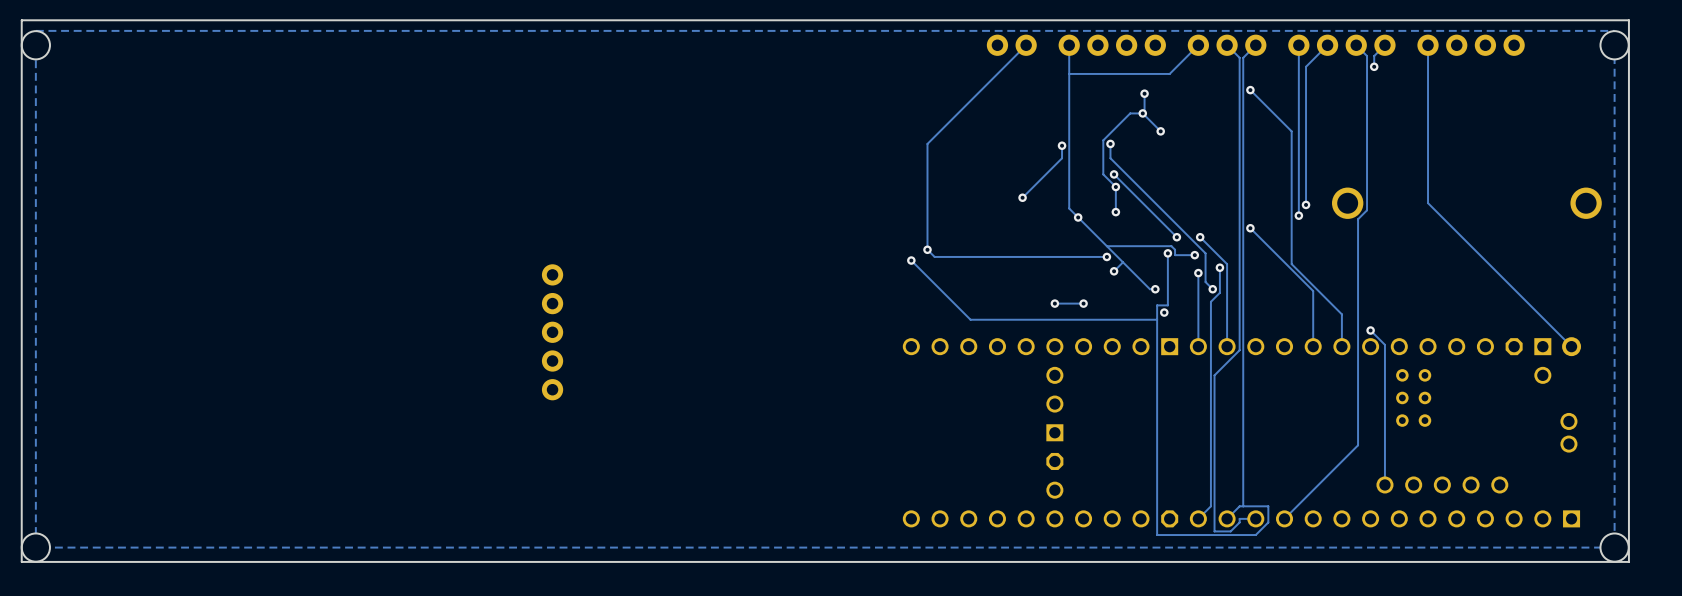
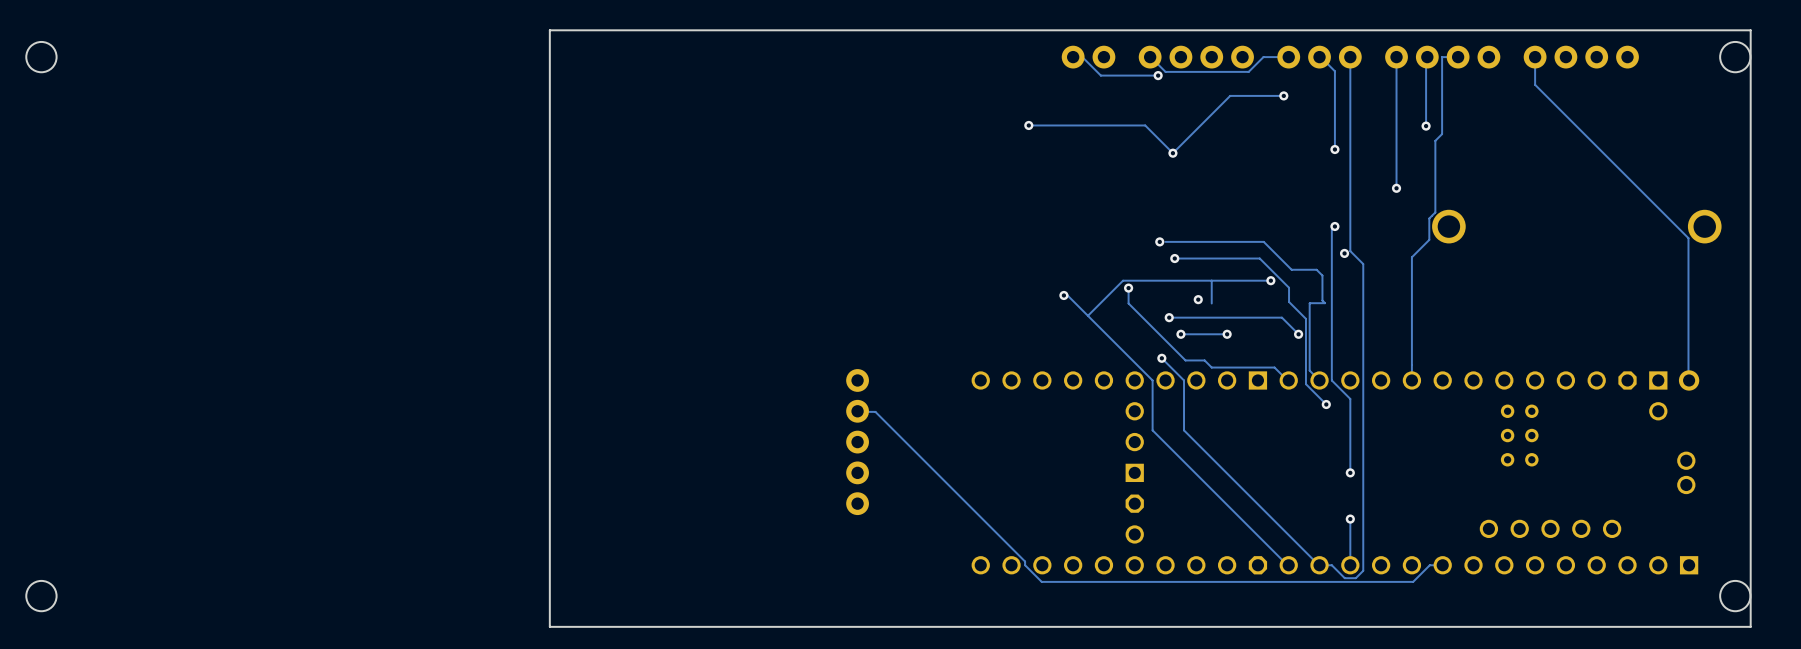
board edge: (509, 20) (21, 20) (21, 561) (1628, 561) -> (549, 30) (549, 626) (1750, 626) (1750, 611)
zone outline: (1614, 30) (1614, 547) (35, 547) (35, 30) (1614, 30) -> none
track: none -> (1073, 57) (1082, 57) (1100, 75) (1158, 75)
track: (1026, 45) (927, 143) (927, 249) (934, 256) (1106, 256) -> none
track: (1069, 45) (1069, 208) (1149, 289) (1155, 289) -> none
track: (1198, 45) (1169, 73) (1069, 73) -> (1288, 57) (1263, 57) (1248, 71) (1165, 71) (1150, 57)
track: (1227, 45) (1239, 57) (1239, 350) (1214, 375) (1214, 531) (1230, 531) (1239, 522) (1239, 518) (1255, 518) -> (1319, 57) (1334, 71) (1334, 149)
track: (1255, 45) (1243, 57) (1243, 506) -> (1350, 57) (1350, 251) (1363, 264) (1363, 570) (1355, 578) (1344, 578) (1331, 565) (1318, 565) (1184, 430) (1184, 380) (1161, 358)
track: (1327, 45) (1306, 66) (1306, 204) -> (1427, 57) (1426, 126)
track: (1356, 45) (1367, 56) (1367, 210) (1358, 219) (1358, 445) (1284, 518) -> none
track: (1384, 45) (1374, 56) (1374, 66) -> none
via: none -> (1158, 75)
via: (1374, 66) -> none
track: (1428, 71) (1428, 203) (1571, 346) -> (1535, 84) (1688, 238) (1689, 380)
track: none -> (1283, 95) (1230, 95) (1172, 153) (1145, 125) (1028, 125)
via: none -> (1283, 95)
track: (1250, 90) (1291, 131) (1291, 264) (1341, 314) (1341, 346) -> none
via: (1250, 90) -> none
track: (1144, 93) (1144, 111) (1142, 113) -> none
via: (1144, 93) -> none
via: none -> (1028, 125)
via: none -> (1426, 126)
track: (1142, 113) (1130, 113) (1103, 140) (1103, 174) (1115, 186) (1115, 212) -> none
track: (1142, 113) (1160, 131) -> none
via: (1142, 113) -> none
via: (1160, 131) -> none
via: none -> (1334, 149)
via: none -> (1172, 153)
track: (1110, 143) (1110, 158) (1205, 253) (1205, 282) (1212, 289) -> none
via: (1110, 143) -> none
track: (1062, 145) (1062, 158) (1022, 197) -> none
via: (1062, 145) -> none
track: (1298, 167) (1298, 215) -> none
via: none -> (1396, 188)
track: (1114, 174) (1176, 237) -> none
via: (1114, 174) -> none
via: (1115, 186) -> none
via: (1022, 197) -> none
track: none -> (1334, 226) (1331, 229) (1331, 380) (1350, 398) (1350, 472)
via: none -> (1334, 226)
via: (1306, 204) -> none
via: (1115, 212) -> none
via: (1298, 215) -> none
track: (1250, 228) (1313, 291) -> (1458, 57) (1442, 57) (1442, 134) (1435, 140) (1435, 212) (1429, 218) (1429, 239) (1411, 257) (1411, 320)
track: none -> (1174, 258) (1259, 258) (1289, 287) (1289, 301) (1305, 318) (1305, 384) (1326, 404)
via: none -> (1174, 258)
via: (1176, 237) -> none
track: (1200, 237) (1227, 264) (1227, 346) -> (1165, 241) (1263, 241) (1291, 269) (1316, 269) (1322, 275) (1322, 300) (1325, 303) (1309, 303) (1309, 370) (1319, 380)
via: (1200, 237) -> none
track: (1106, 246) (1171, 246) (1175, 249) (1175, 255) (1194, 255) -> none
via: (927, 249) -> none
track: none -> (1211, 280) (1211, 303)
track: (1167, 253) (1167, 305) (1157, 305) (1157, 535) (1255, 535) (1268, 522) (1268, 506) (1239, 506) (1227, 518) -> none
via: (1167, 253) -> none
track: none -> (1270, 280) (1123, 280) (1087, 315)
via: none -> (1270, 280)
via: (1194, 255) -> none
via: (1106, 256) -> none
track: (911, 260) (970, 319) (1157, 319) -> none
via: (911, 260) -> none
via: none -> (1128, 288)
track: (1123, 262) (1114, 271) -> none
via: none -> (1063, 295)
track: (1219, 267) (1219, 292) (1210, 301) (1210, 506) (1198, 518) -> (1063, 295) (1067, 295) (1152, 380) (1152, 430) (1288, 565)
via: (1219, 267) -> none
track: (1198, 273) (1198, 346) -> (1128, 288) (1128, 303) (1185, 360) (1204, 360) (1211, 367) (1274, 367) (1288, 380)
via: (1198, 273) -> none
track: none -> (1169, 317) (1281, 317) (1298, 334)
via: none -> (1169, 317)
via: (1155, 289) -> none
via position: (1212, 289) -> (1298, 334)
via: (1054, 303) -> none
track: (1083, 303) (1054, 303) -> none
via: (1083, 303) -> none
via: none -> (1180, 334)
track: none -> (1227, 334) (1180, 334)
via: none -> (1227, 334)
via: (1164, 312) -> none
via: none -> (1161, 358)
track: (1370, 330) (1384, 344) (1384, 484) -> none
via: (1370, 330) -> none
part position: (552, 332) -> (857, 442)
via: none -> (1326, 404)
track: none -> (857, 411) (875, 411) (1025, 561) (1025, 565) (1041, 581) (1413, 581) (1429, 565) (1442, 565)
via: none -> (1350, 472)
track: none -> (1350, 519) (1350, 565)
via: none -> (1350, 519)

